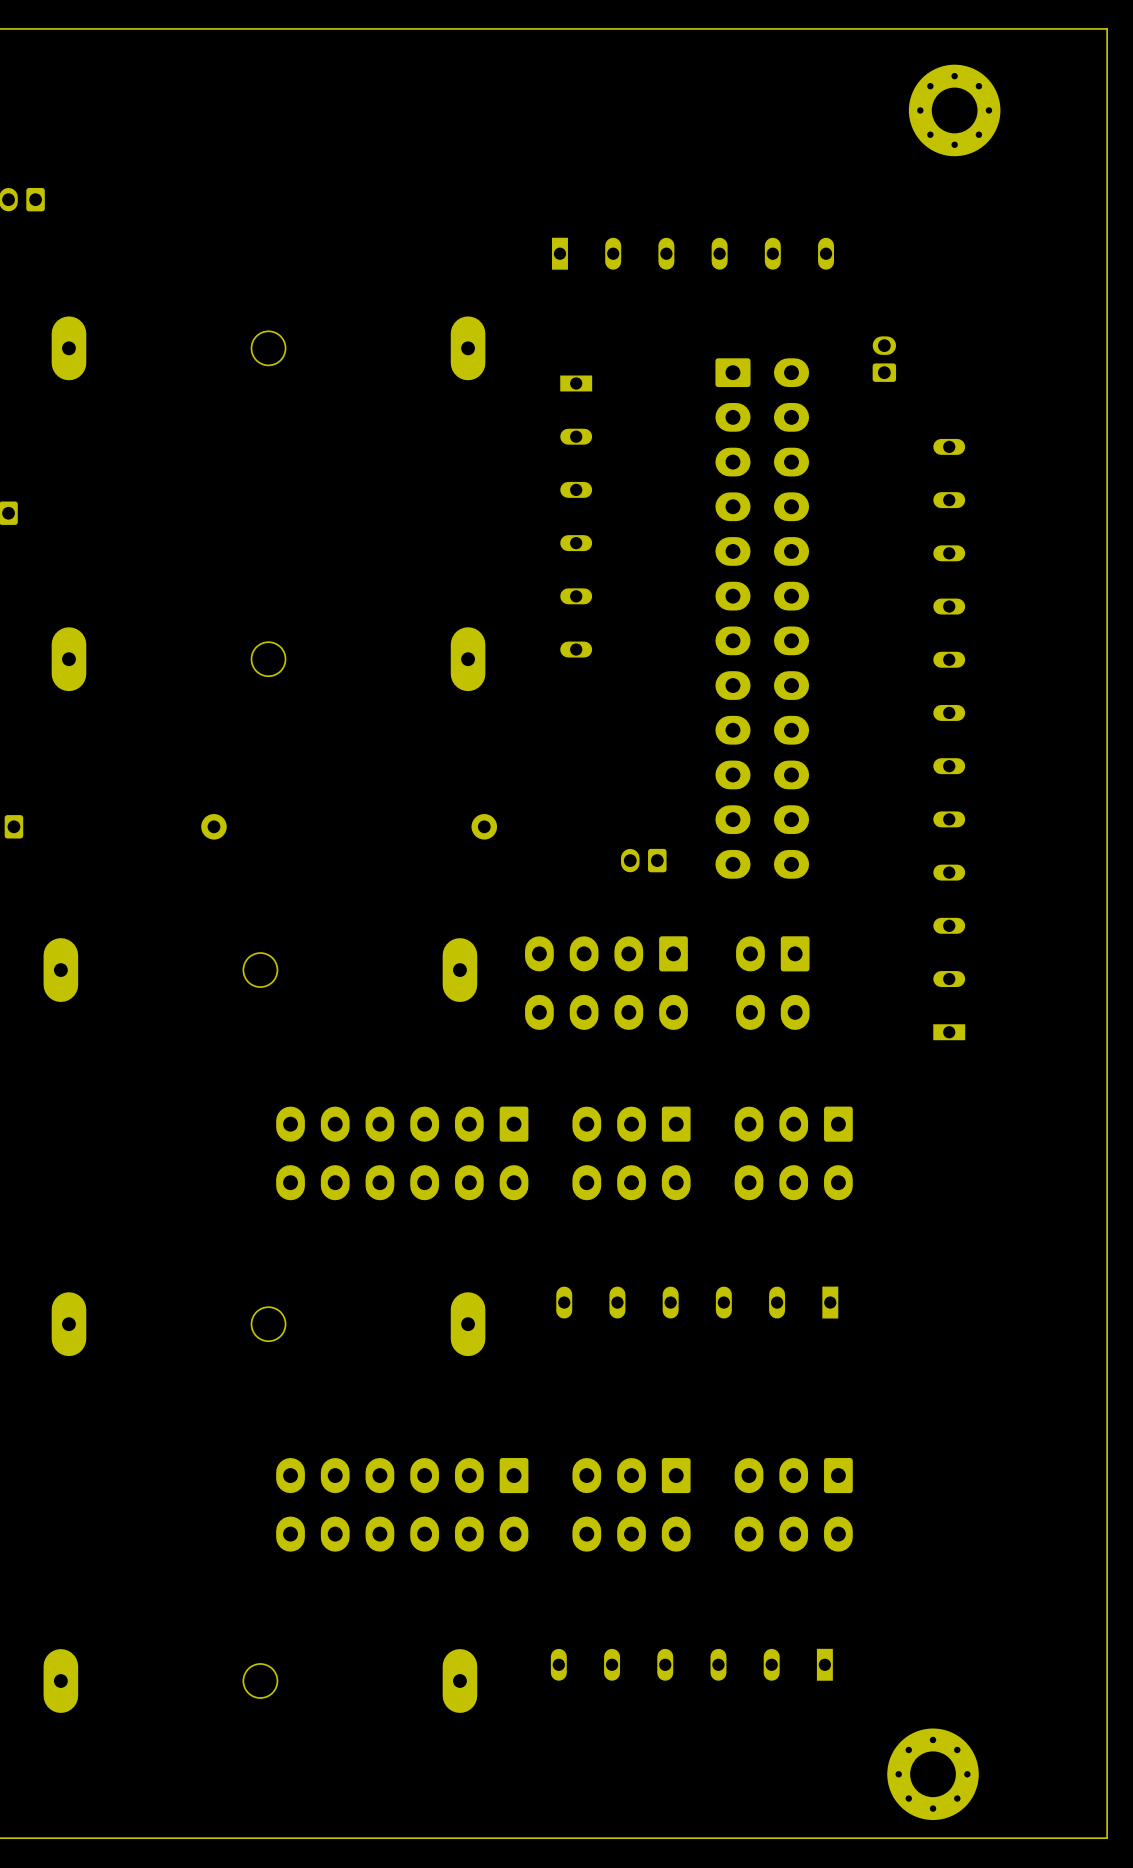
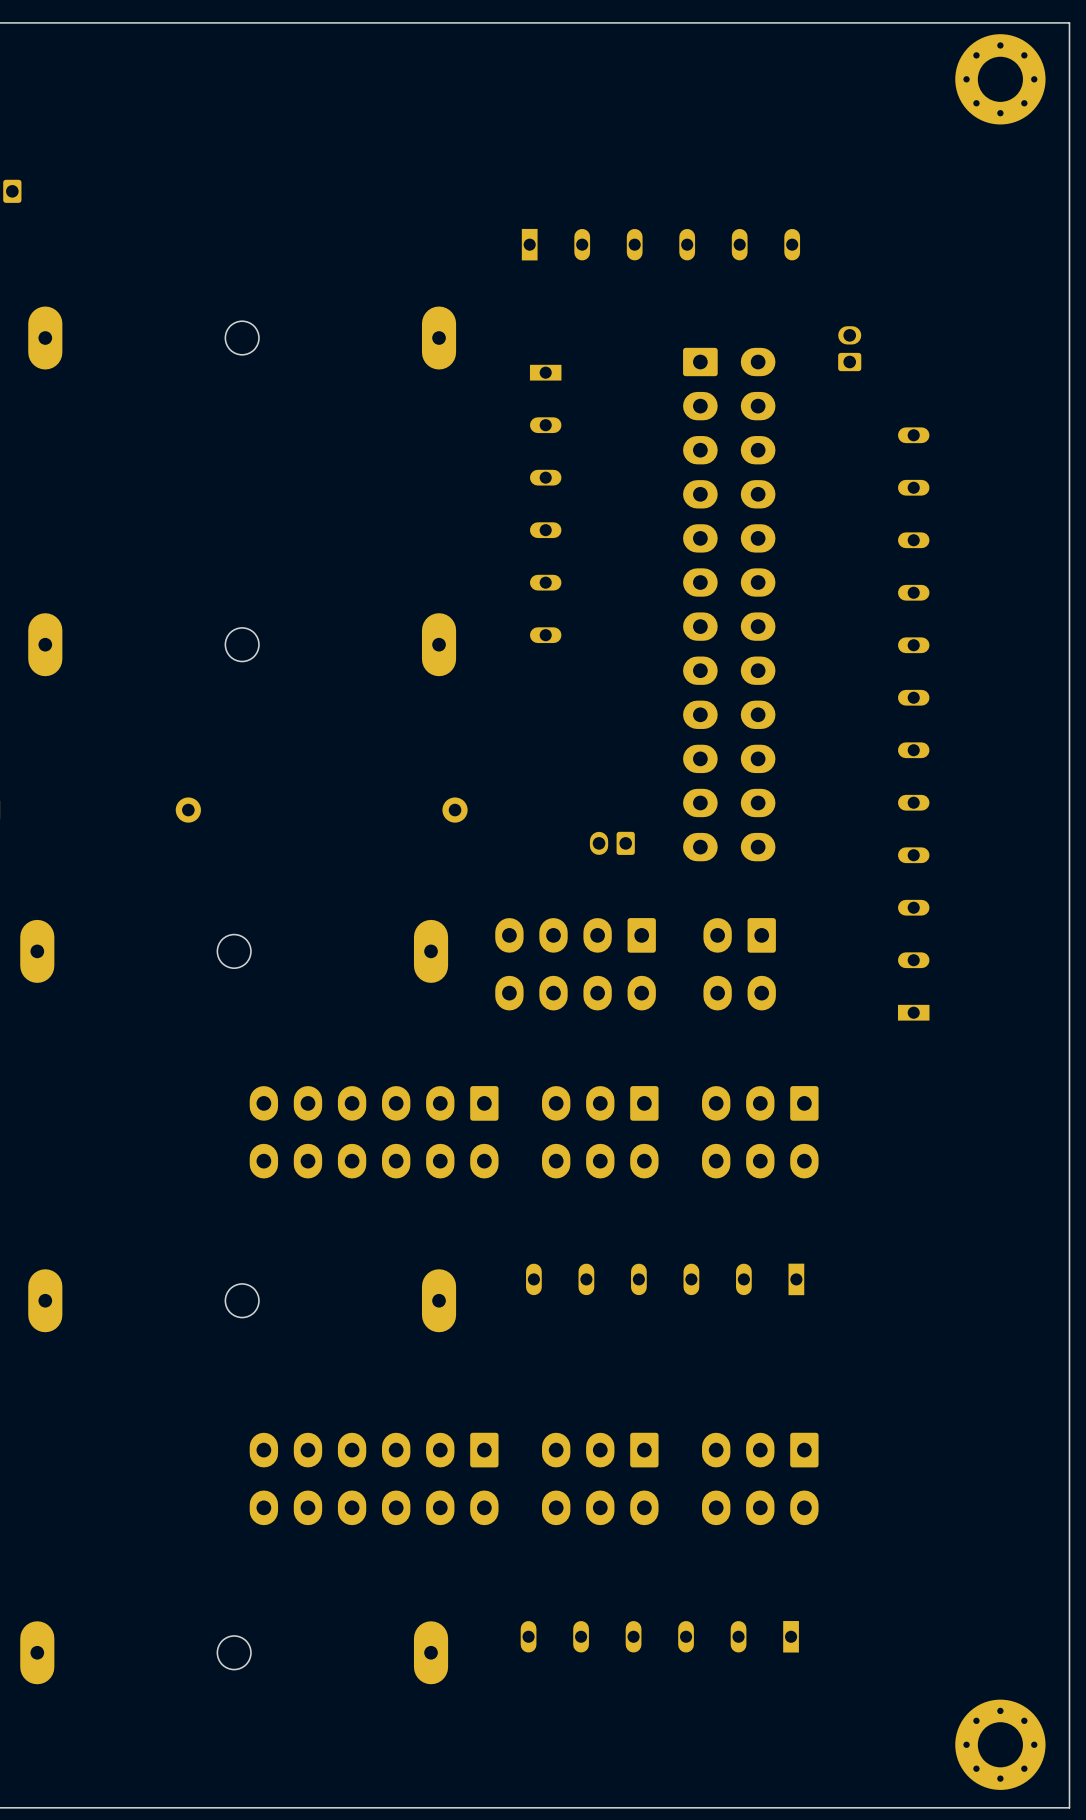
part position: (954, 110) -> (1000, 79)
part position: (933, 1774) -> (1000, 1744)

